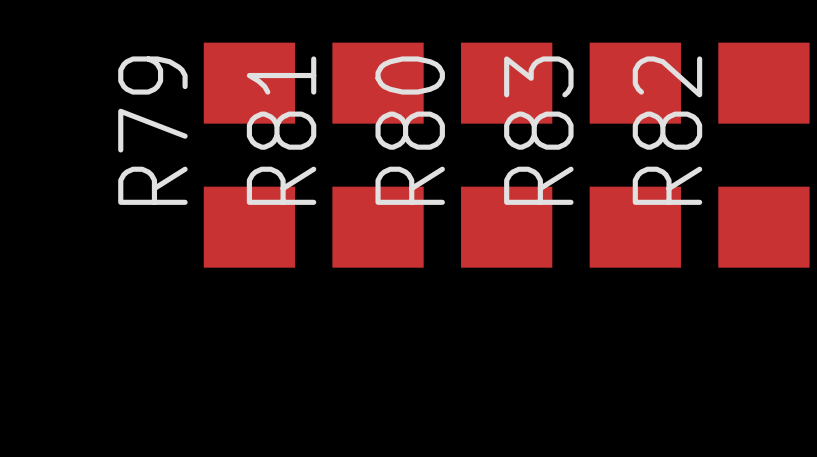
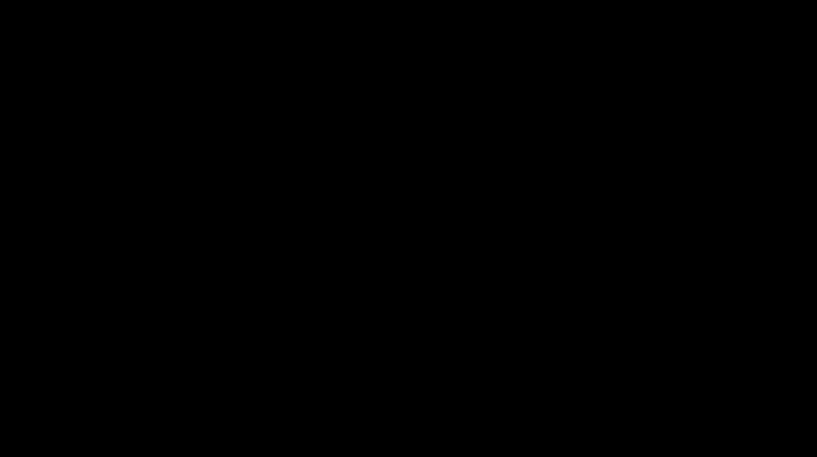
R79: (249, 155) -> none
R81: (378, 155) -> none
R80: (506, 155) -> none
R83: (635, 155) -> none
R82: (763, 155) -> none

